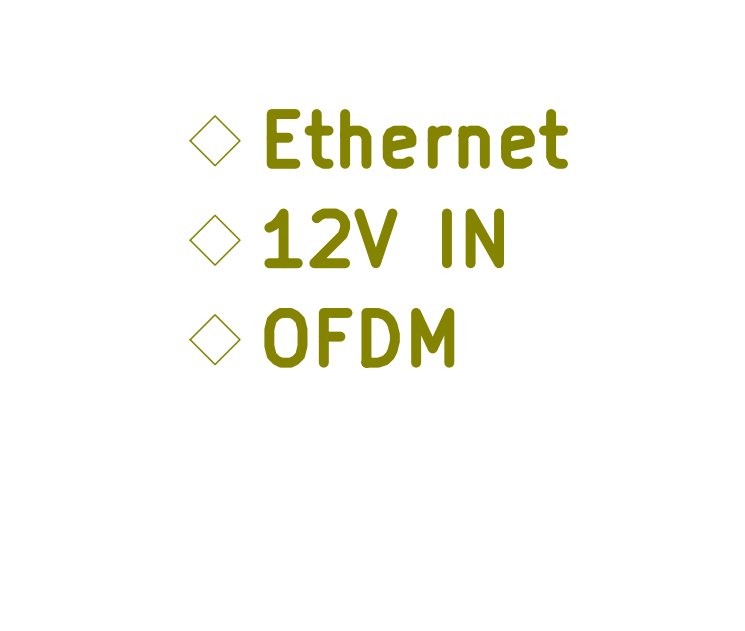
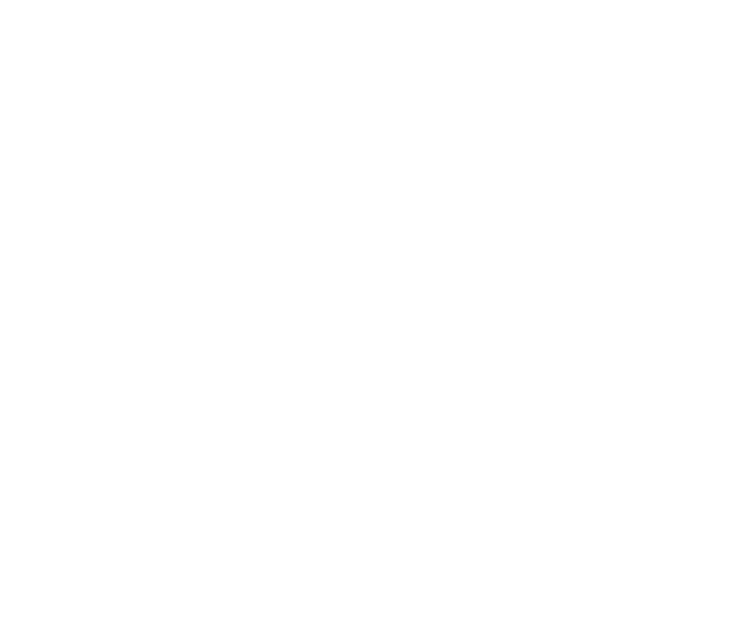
hierarchical label: Ethernet (417, 138) -> none
hierarchical label: 12V IN (384, 238) -> none
hierarchical label: OFDM (359, 337) -> none

